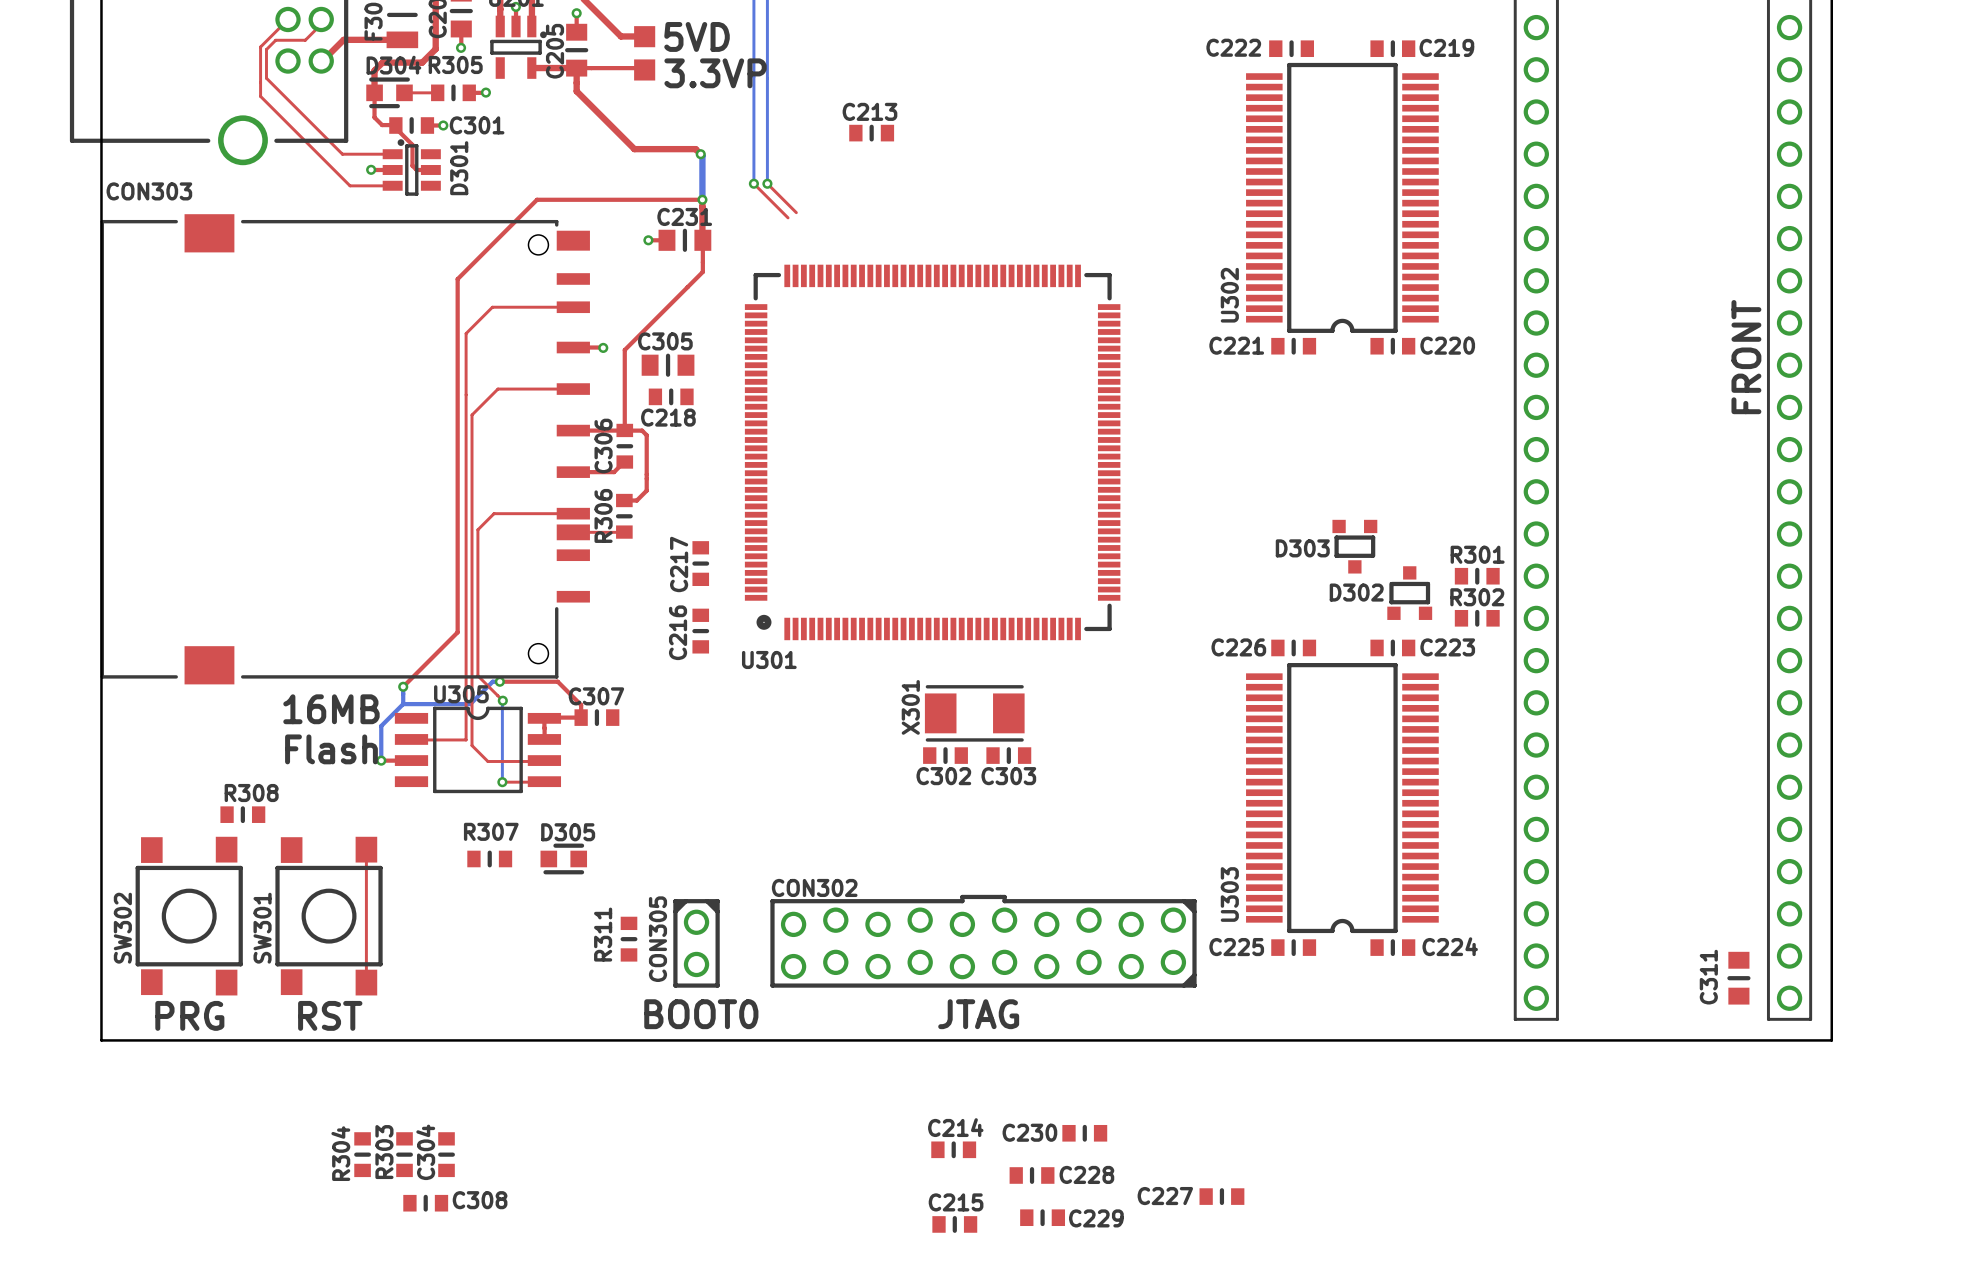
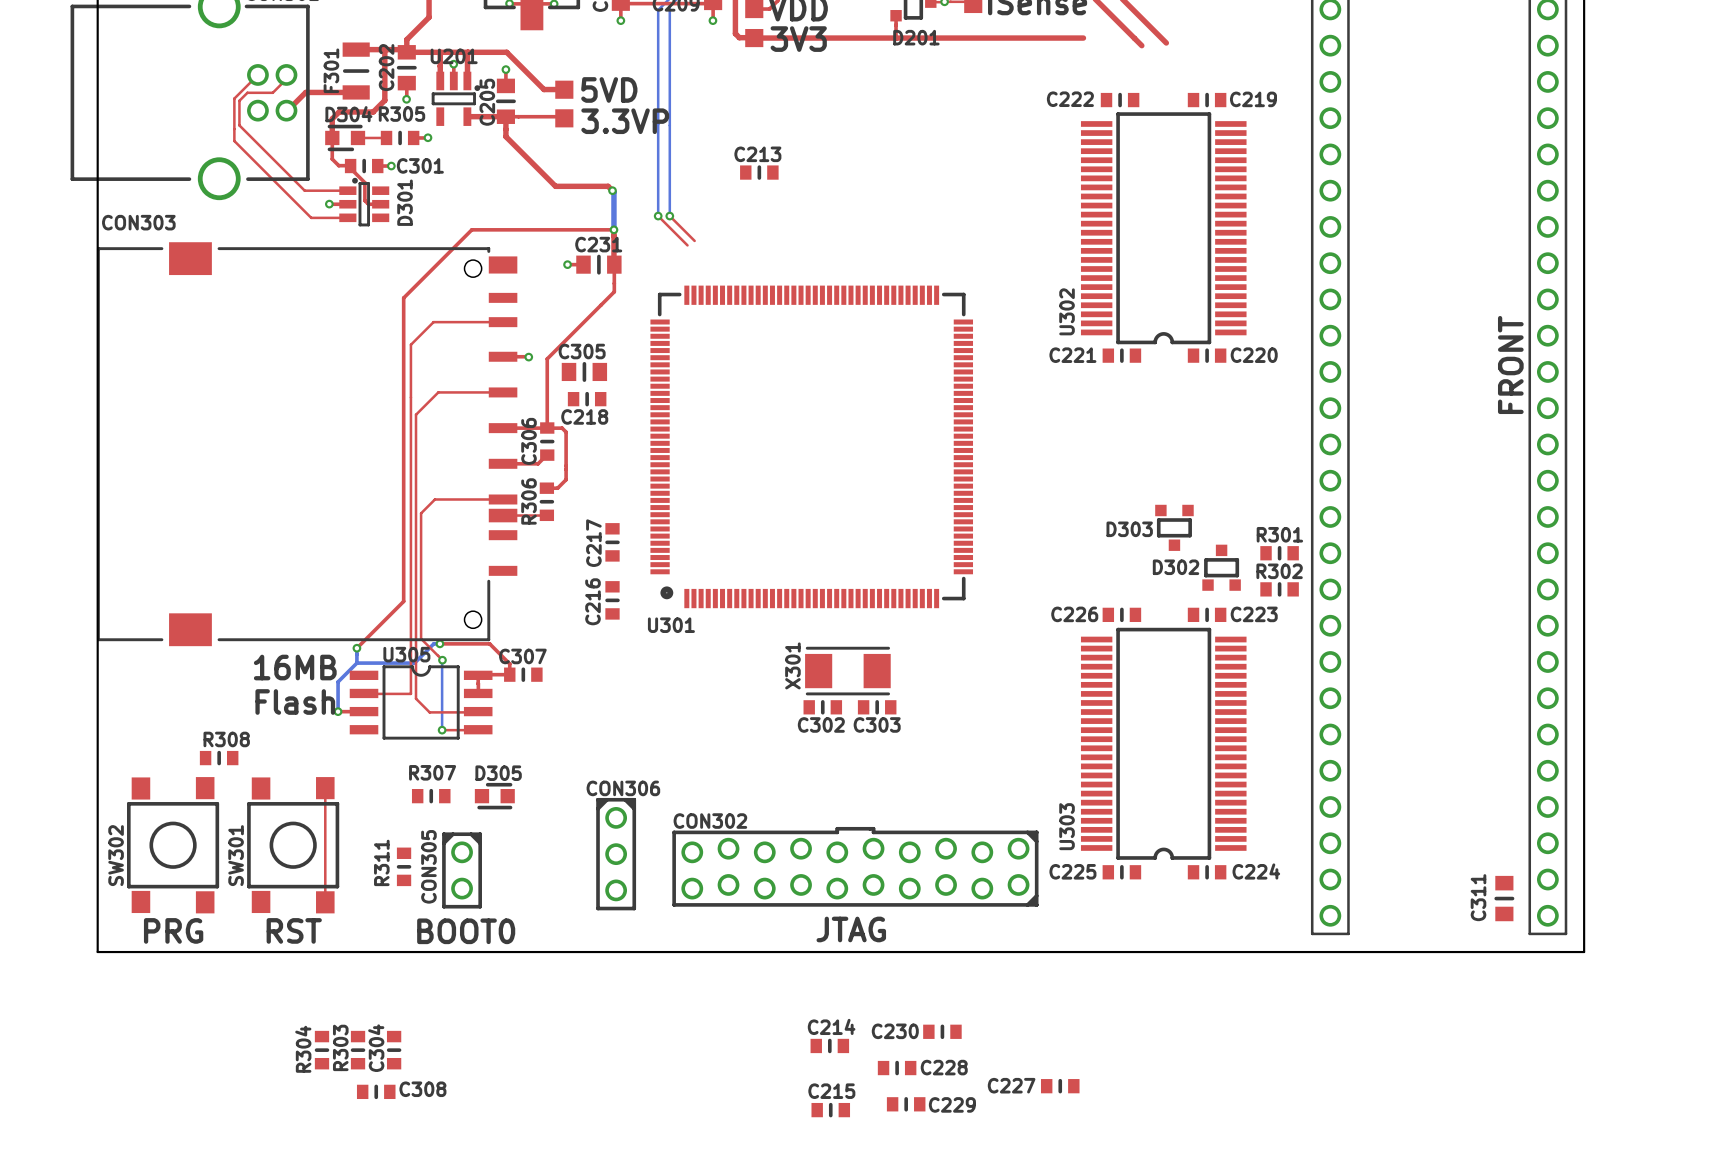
CON306: none -> (616, 854)
R311 position: (629, 939) -> (404, 866)
CON305 position: (696, 943) -> (462, 870)
text position: BOOT0 (701, 1014) -> BOOT0 (466, 931)

